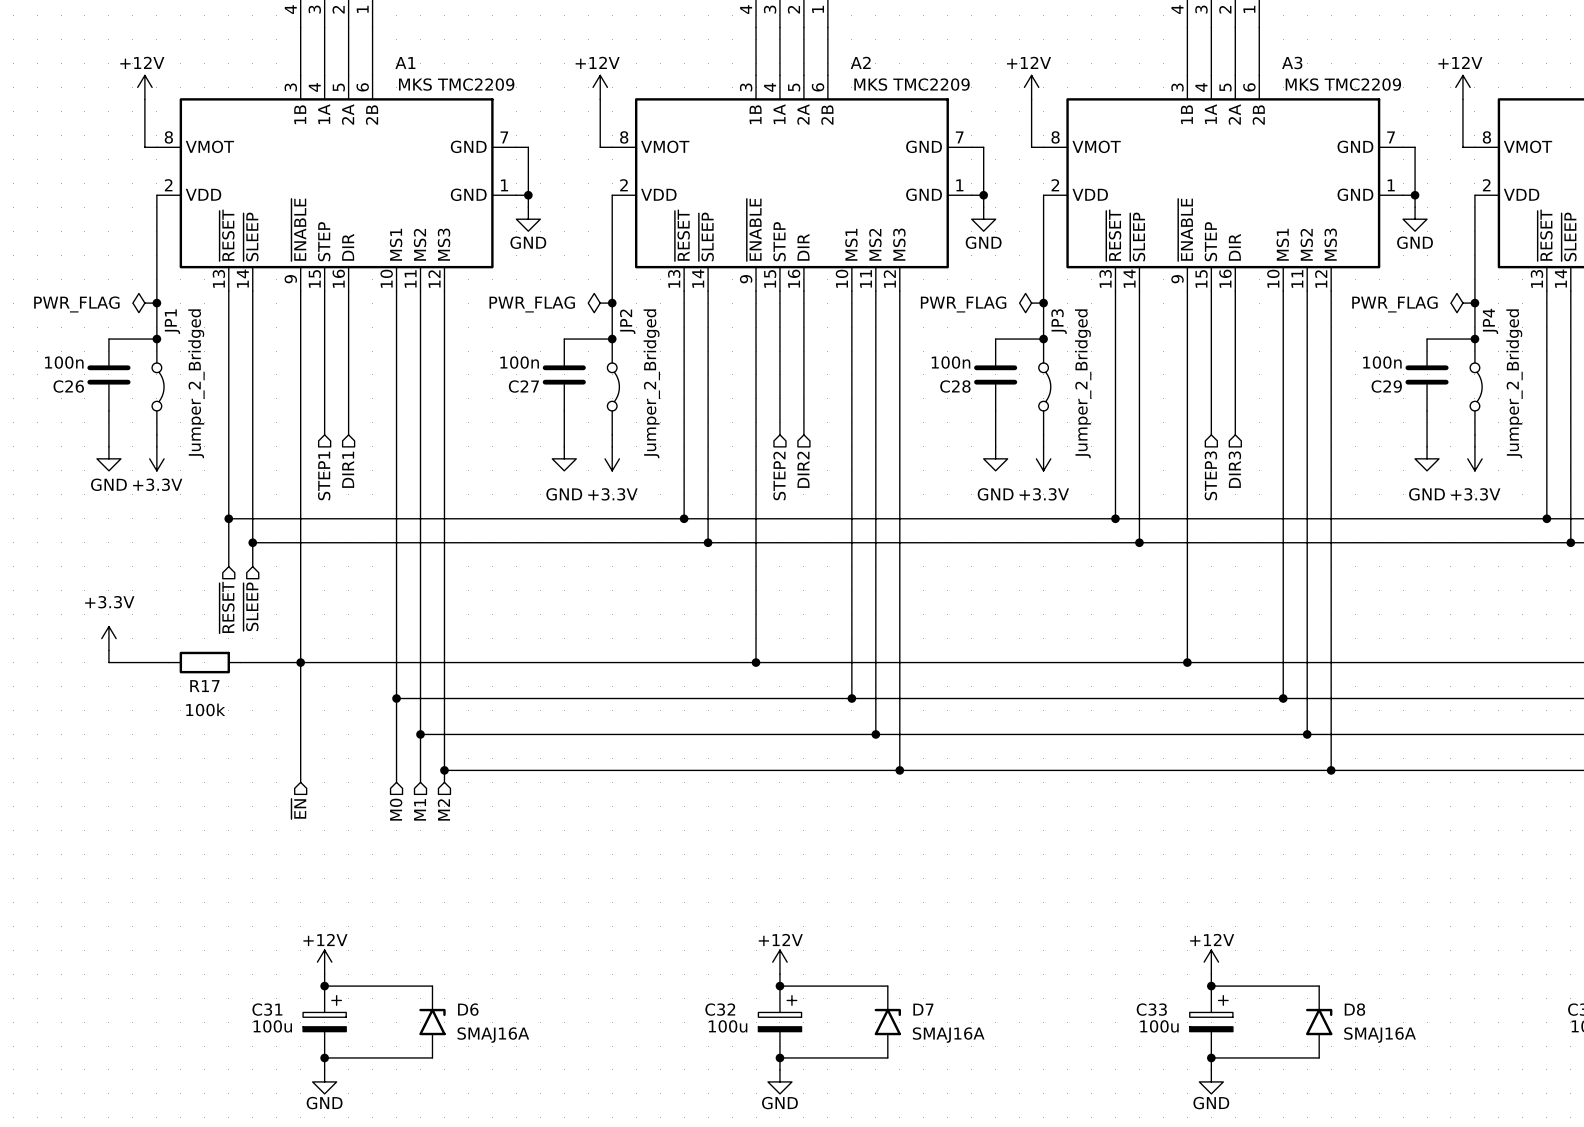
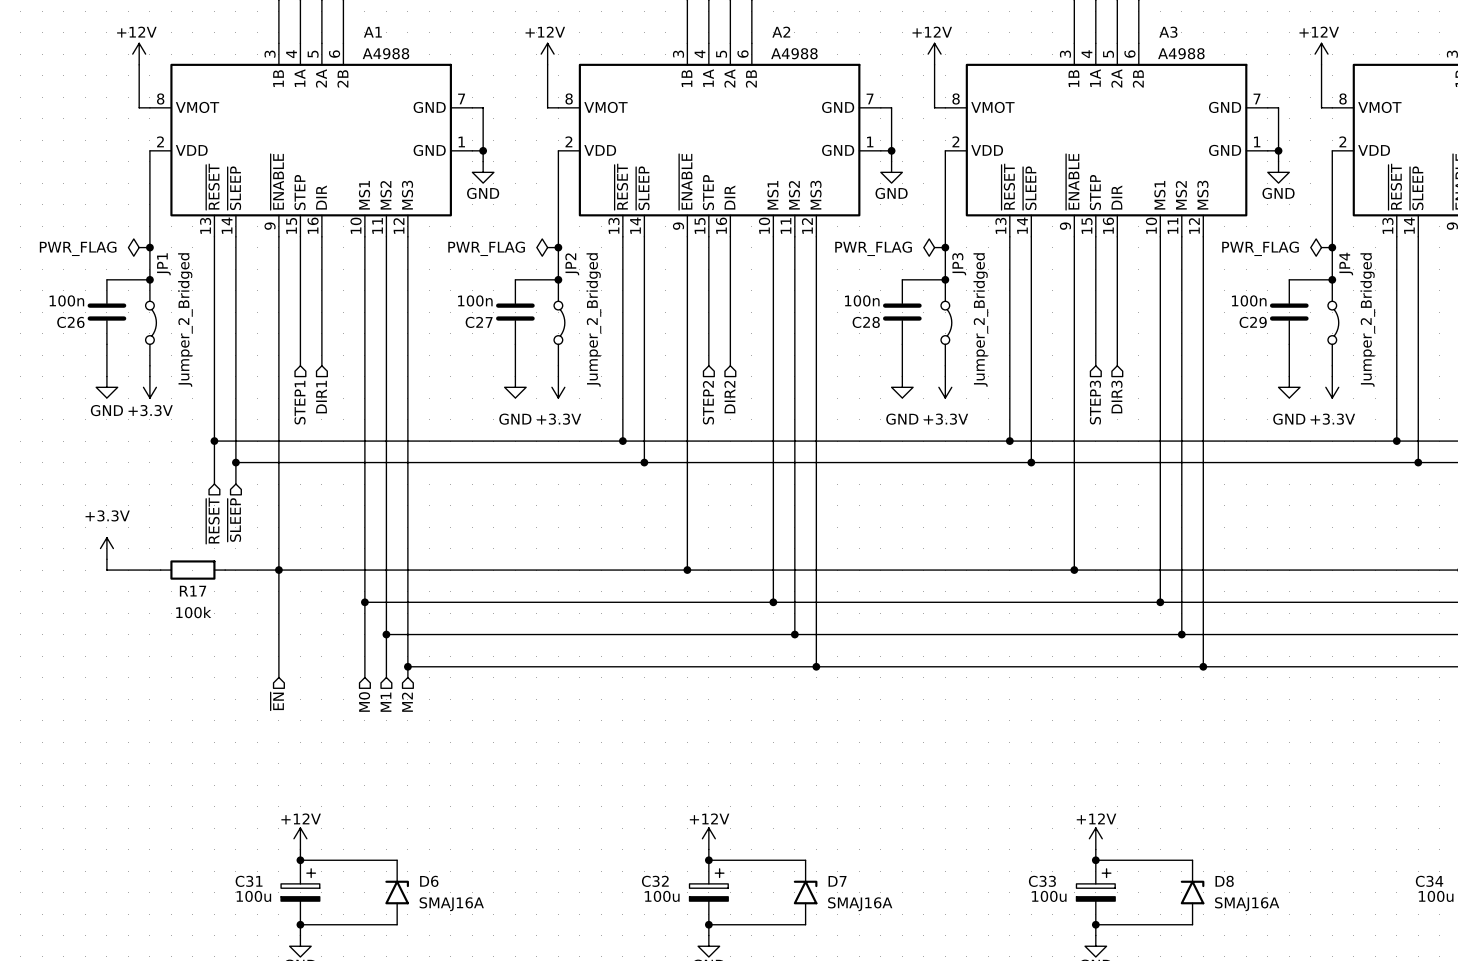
A1 value: MKS TMC2209 (456, 84) -> A4988 (385, 53)
A2 value: MKS TMC2209 (912, 84) -> A4988 (794, 53)
A3 value: MKS TMC2209 (1343, 84) -> A4988 (1181, 53)

